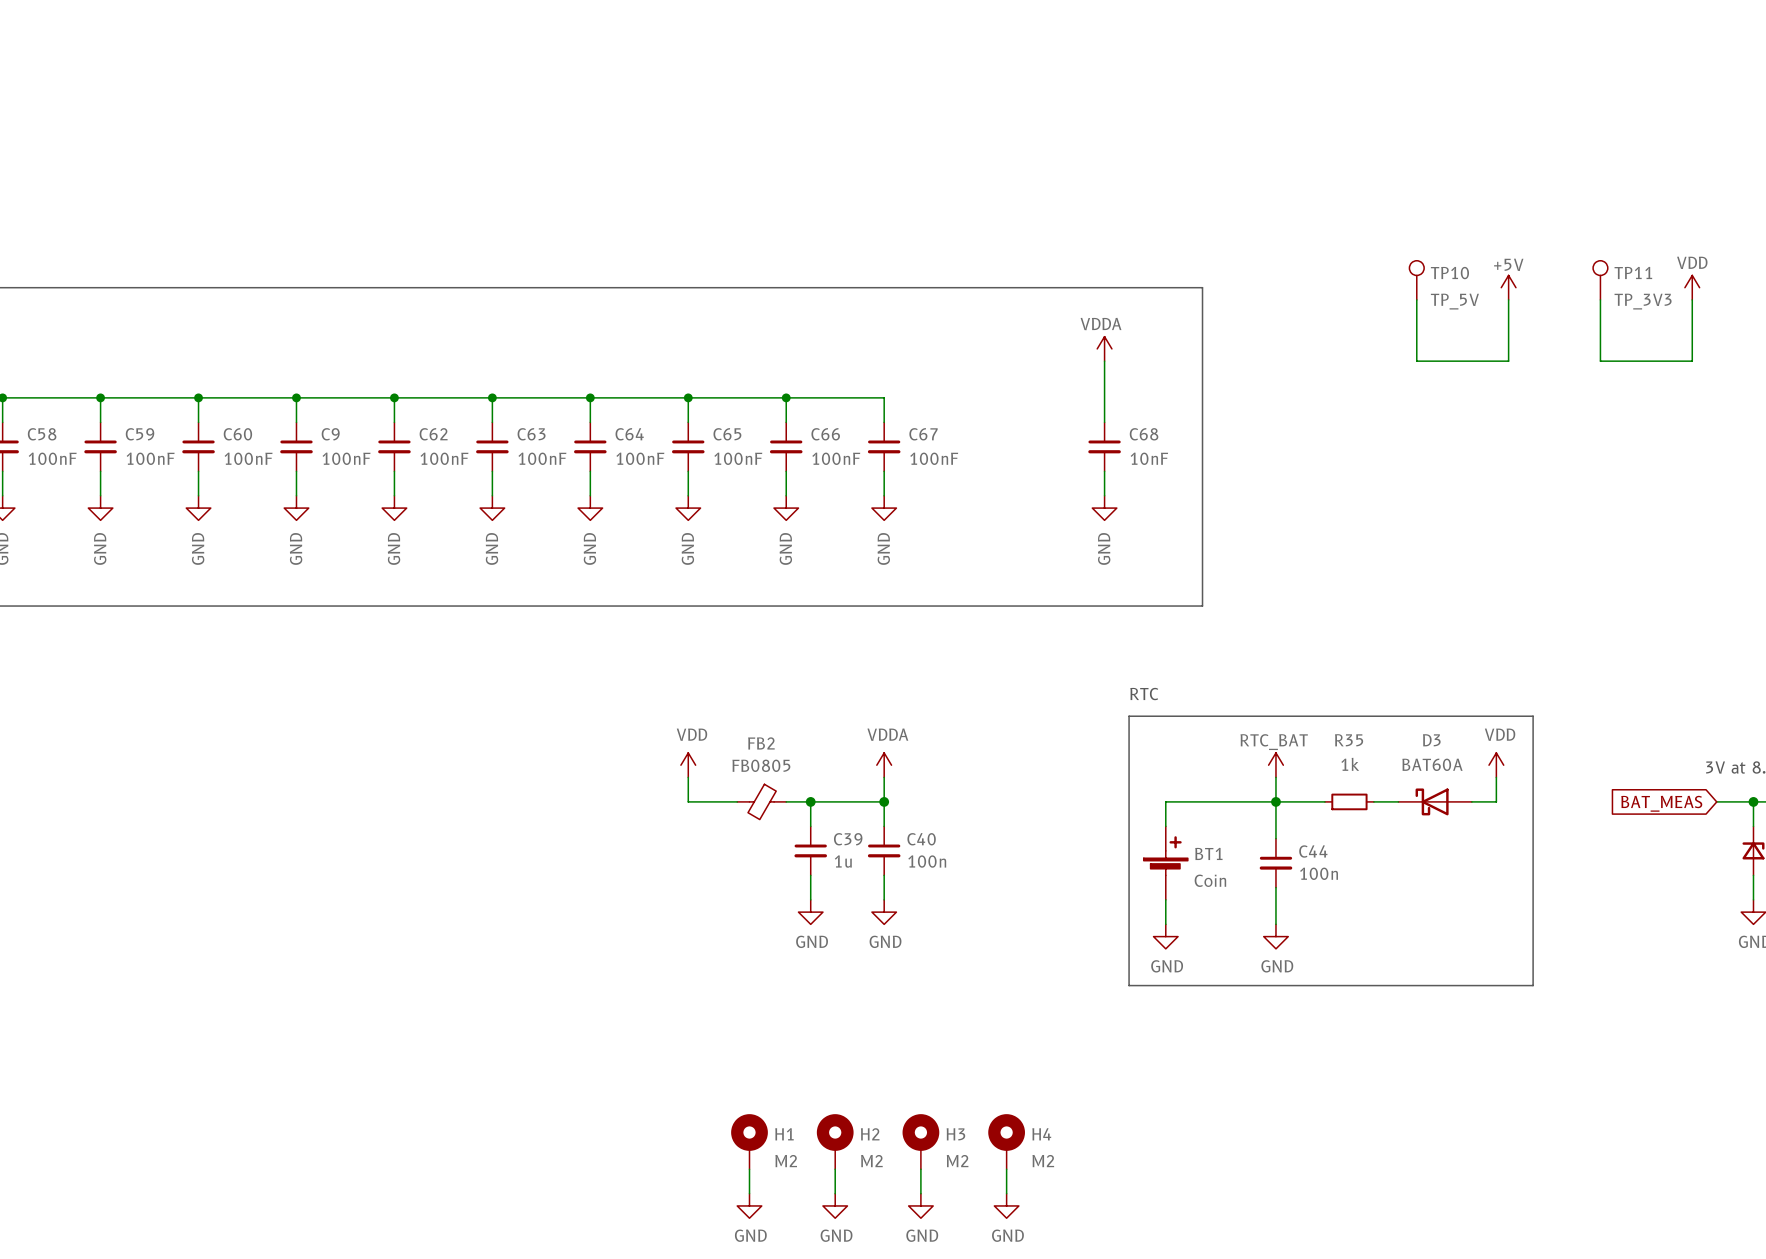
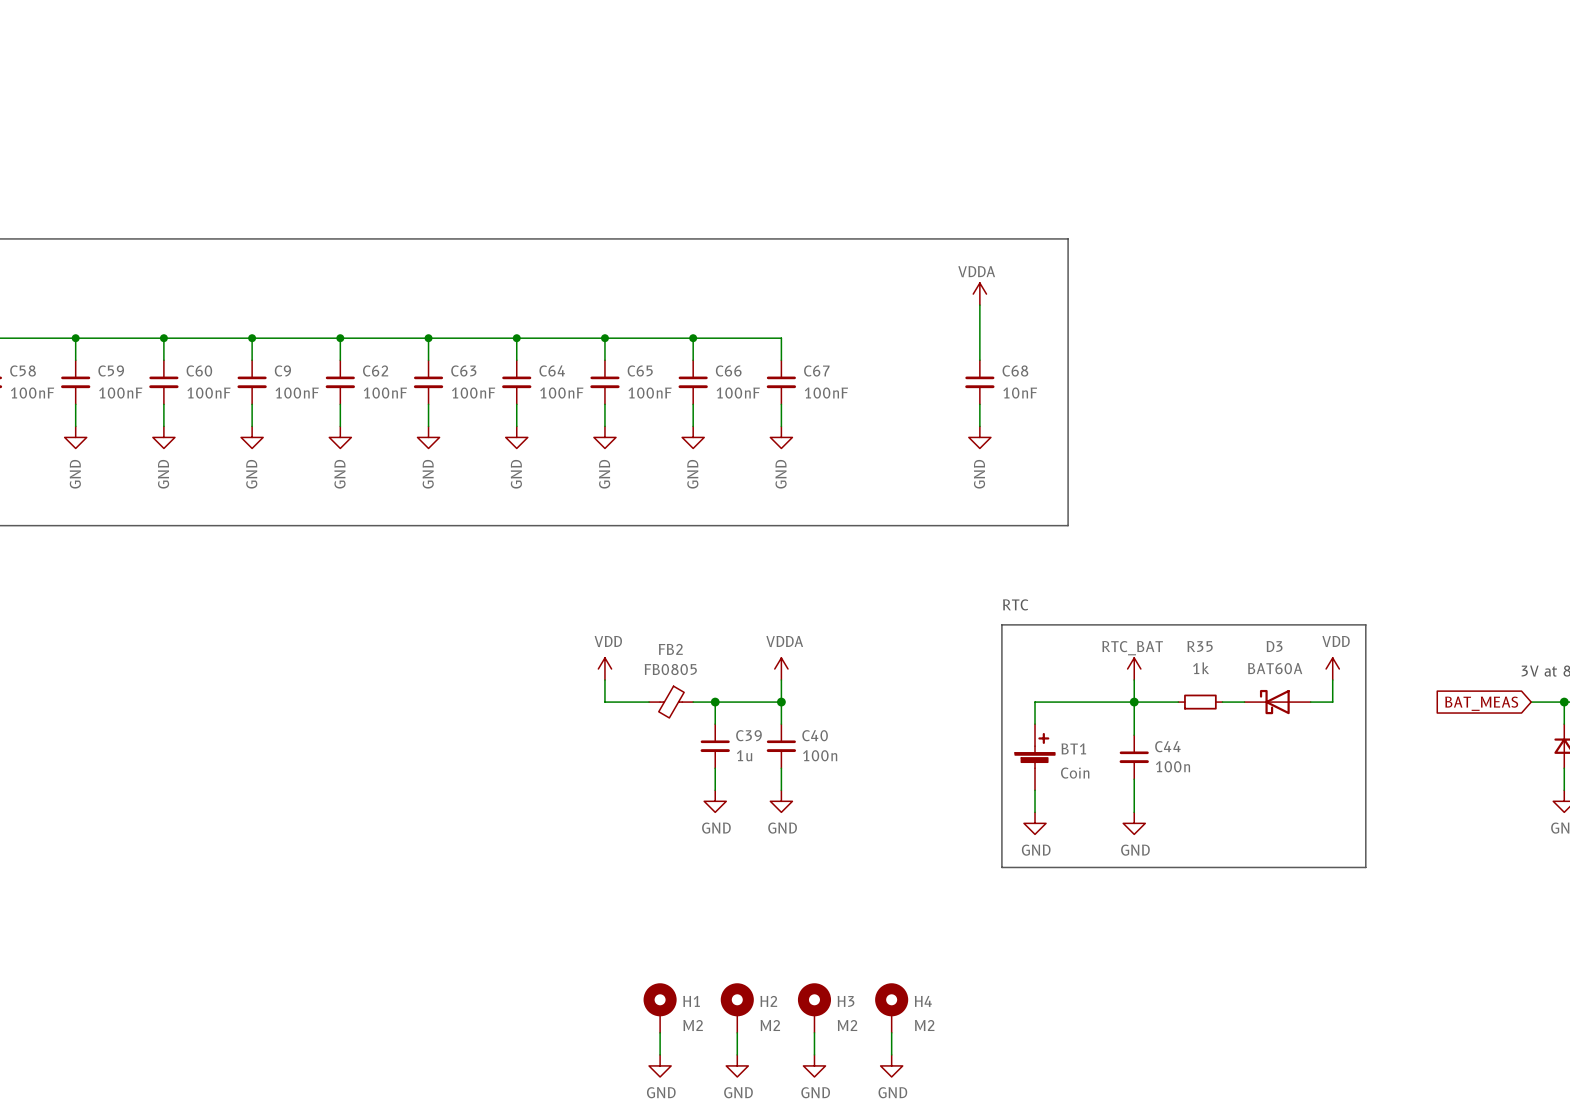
TP10: TP_5V (1416, 280) -> none
TP11: TP_3V3 (1600, 280) -> none
power symbol: +5V (1508, 287) -> none
power symbol: VDD (1692, 287) -> none
wire: (1416, 299) (1416, 361) (1508, 361) (1508, 299) -> none
wire: (1600, 299) (1600, 361) (1692, 361) (1692, 299) -> none

